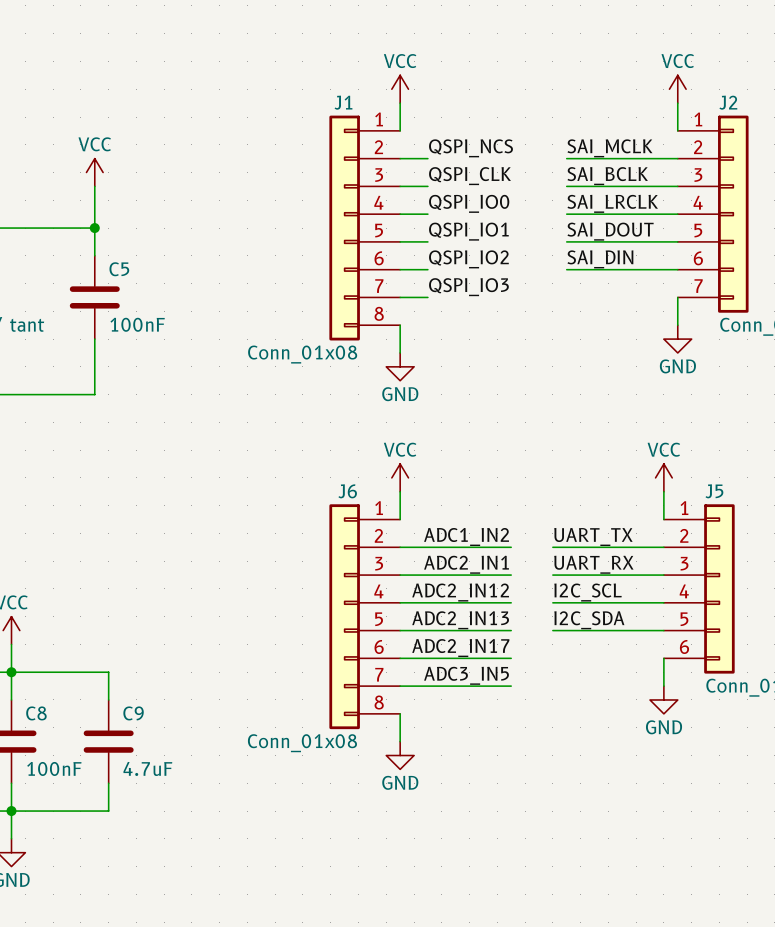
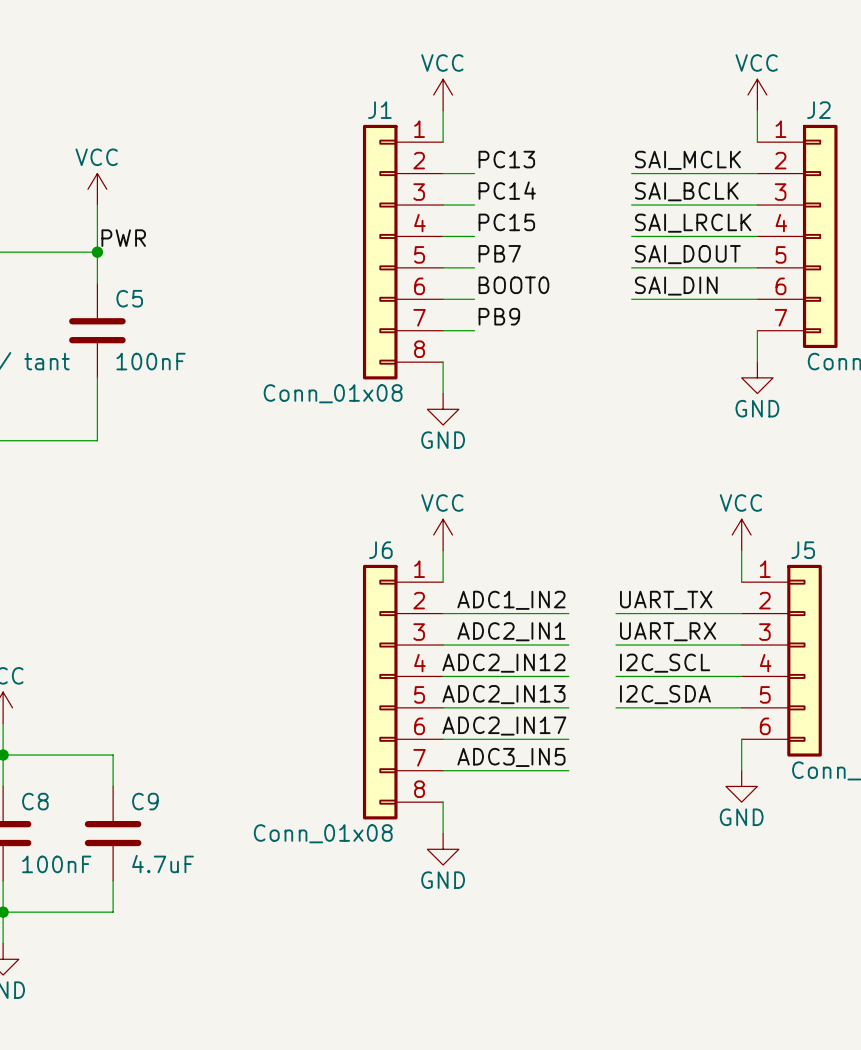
label: QSPI_NCS (470, 148) -> PC13 (506, 159)
label: QSPI_CLK (469, 176) -> PC14 (507, 190)
label: QSPI_IO0 (469, 203) -> PC15 (506, 222)
label: none -> PWR (123, 238)
label: QSPI_IO1 (468, 231) -> PB7 (499, 253)
label: QSPI_IO2 (468, 259) -> BOOT0 (513, 285)
label: QSPI_IO3 (468, 287) -> PB9 (499, 316)

